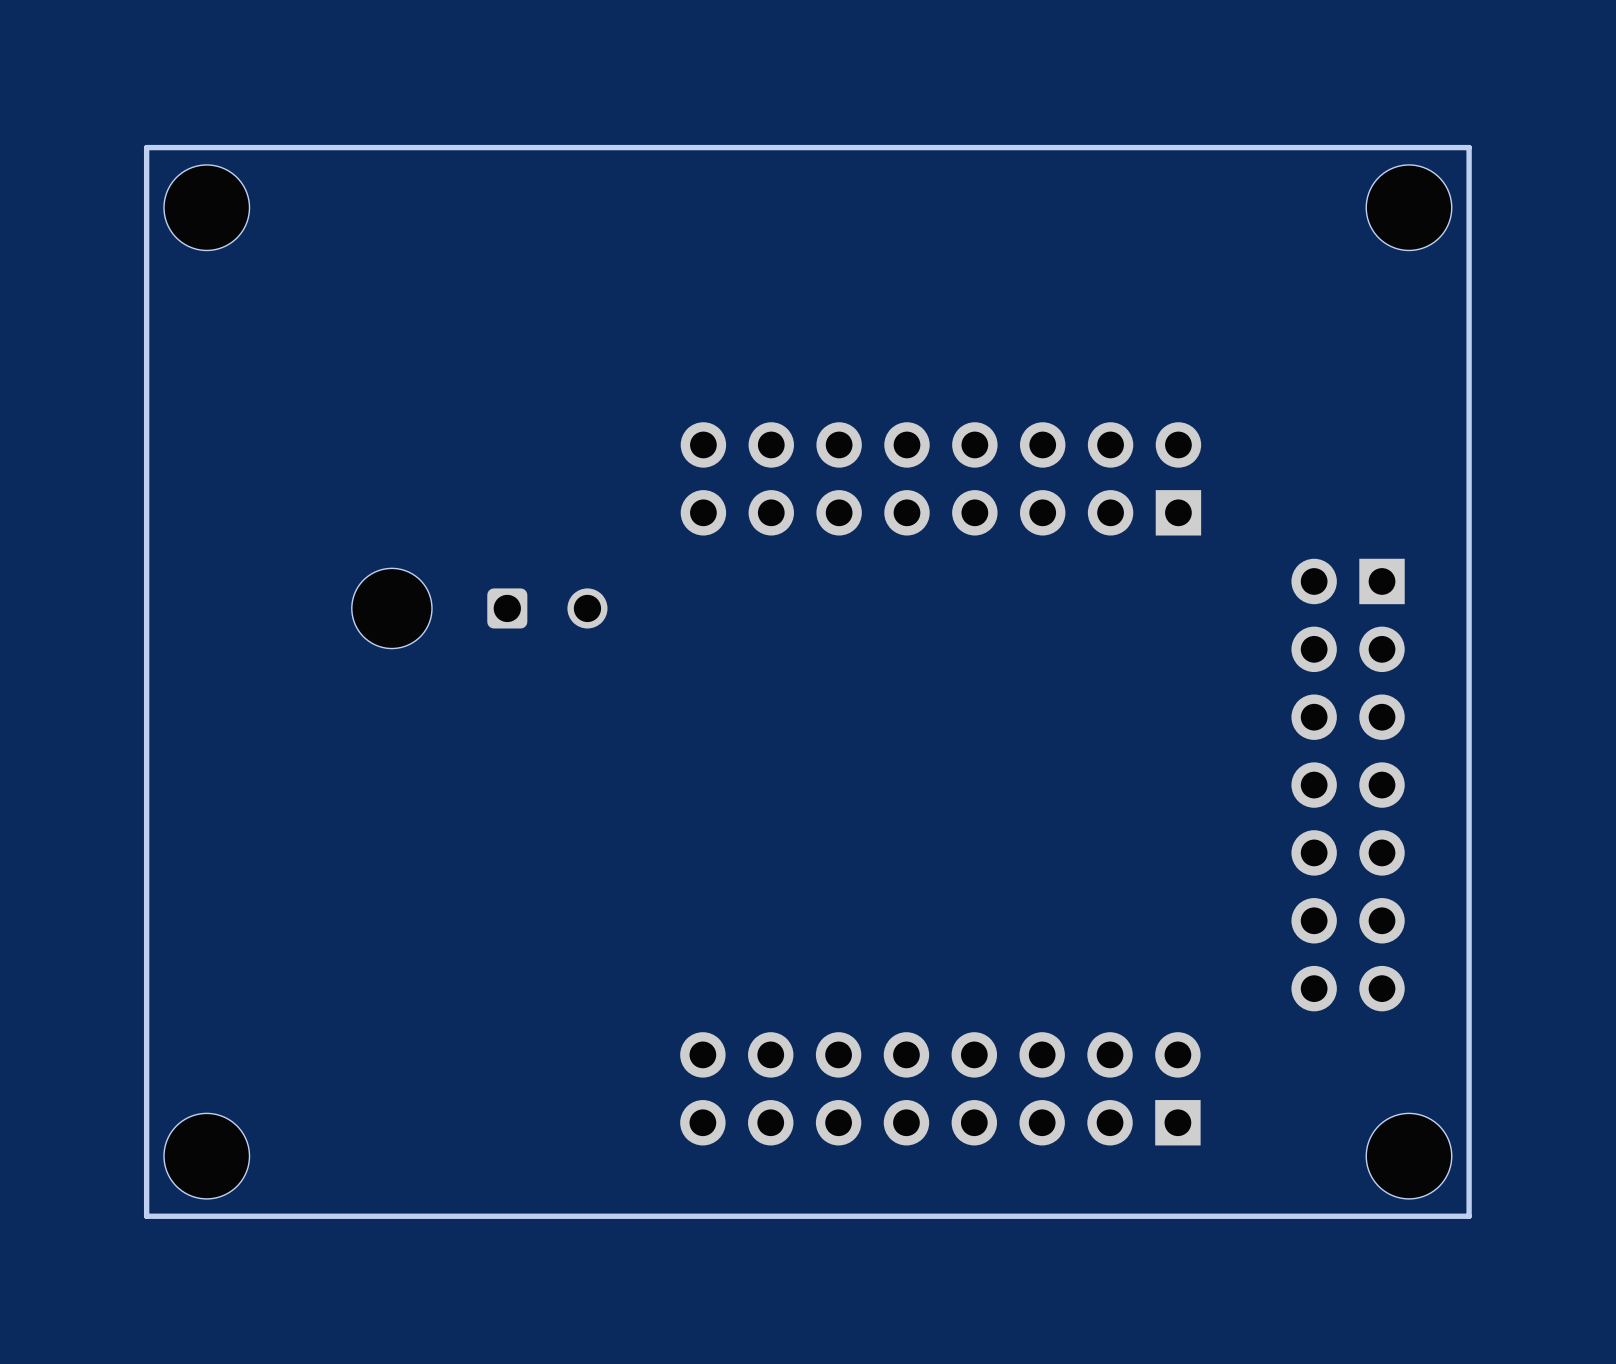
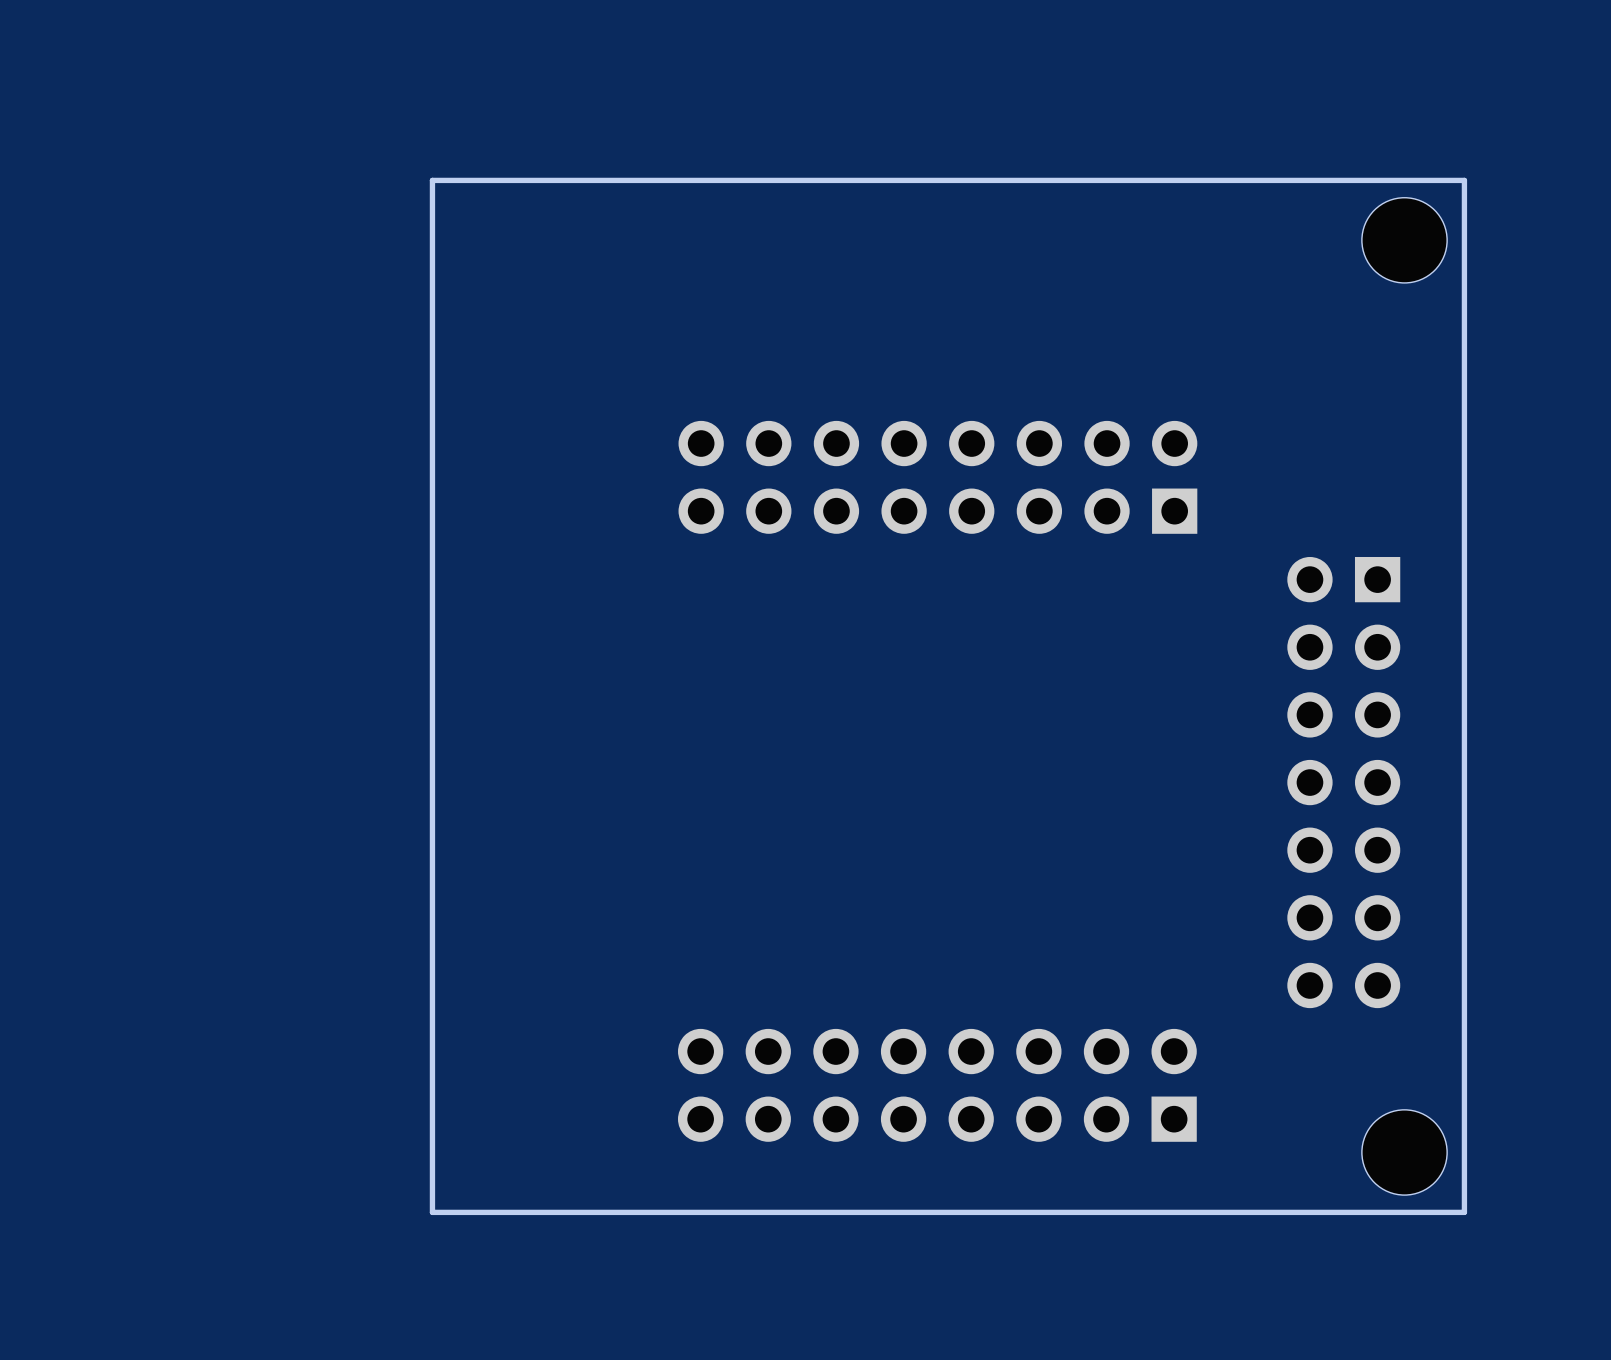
board edge: (1469, 180) (1469, 147) (146, 147) (146, 1216) (433, 1216) -> (1464, 180) (432, 180) (432, 1212)
part: (206, 207) -> none
part position: (1408, 207) -> (1404, 240)
part: (479, 608) -> none
part: (206, 1156) -> none

